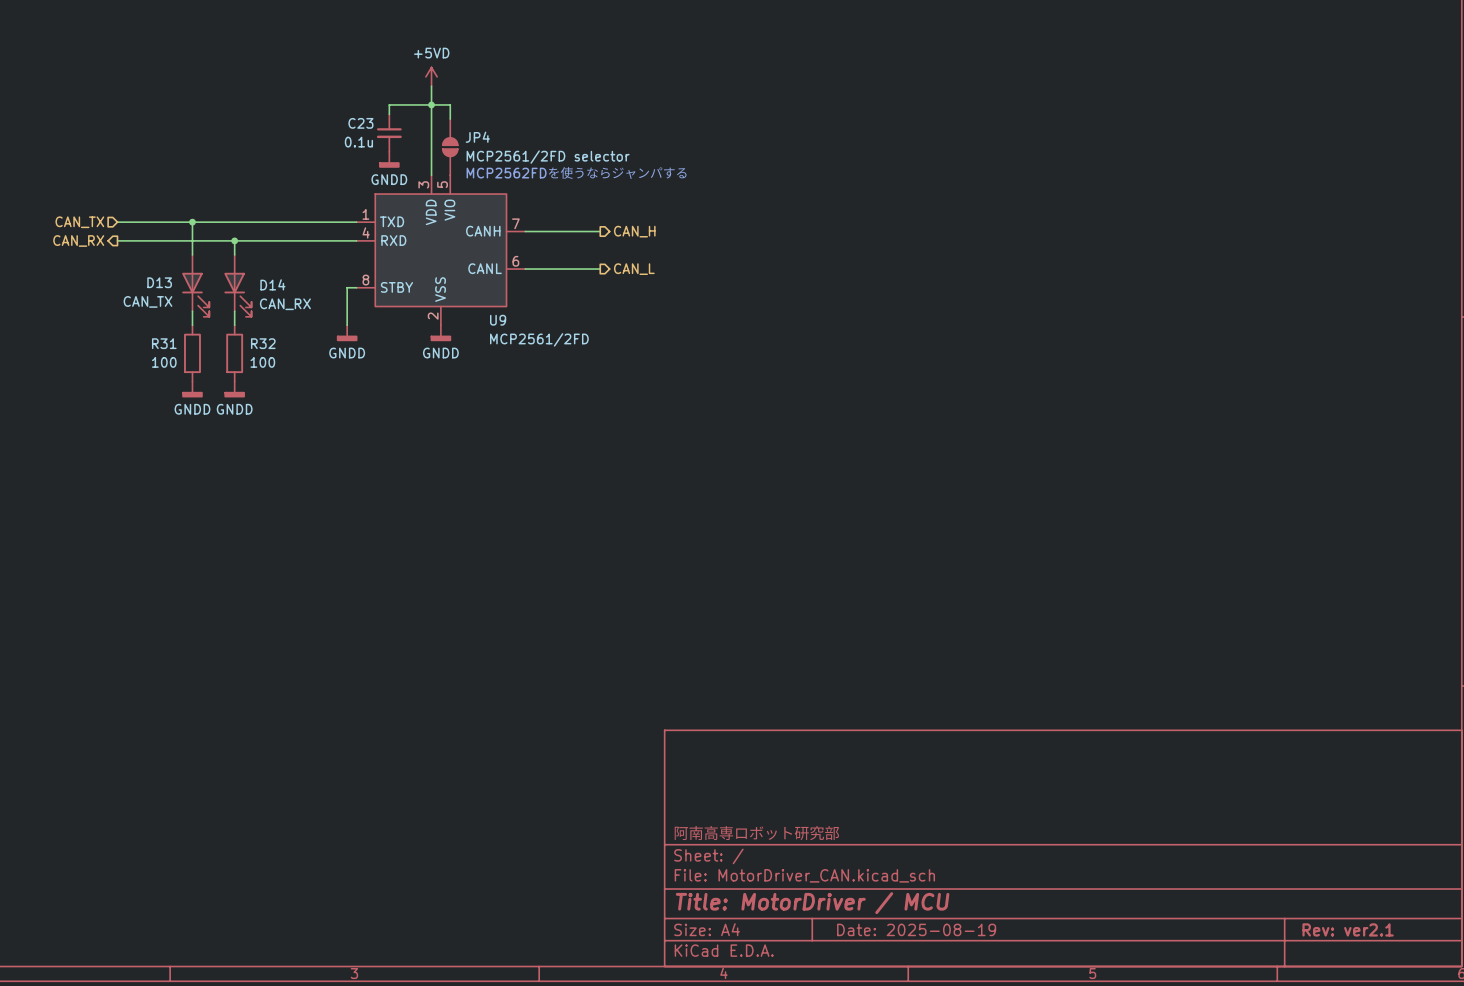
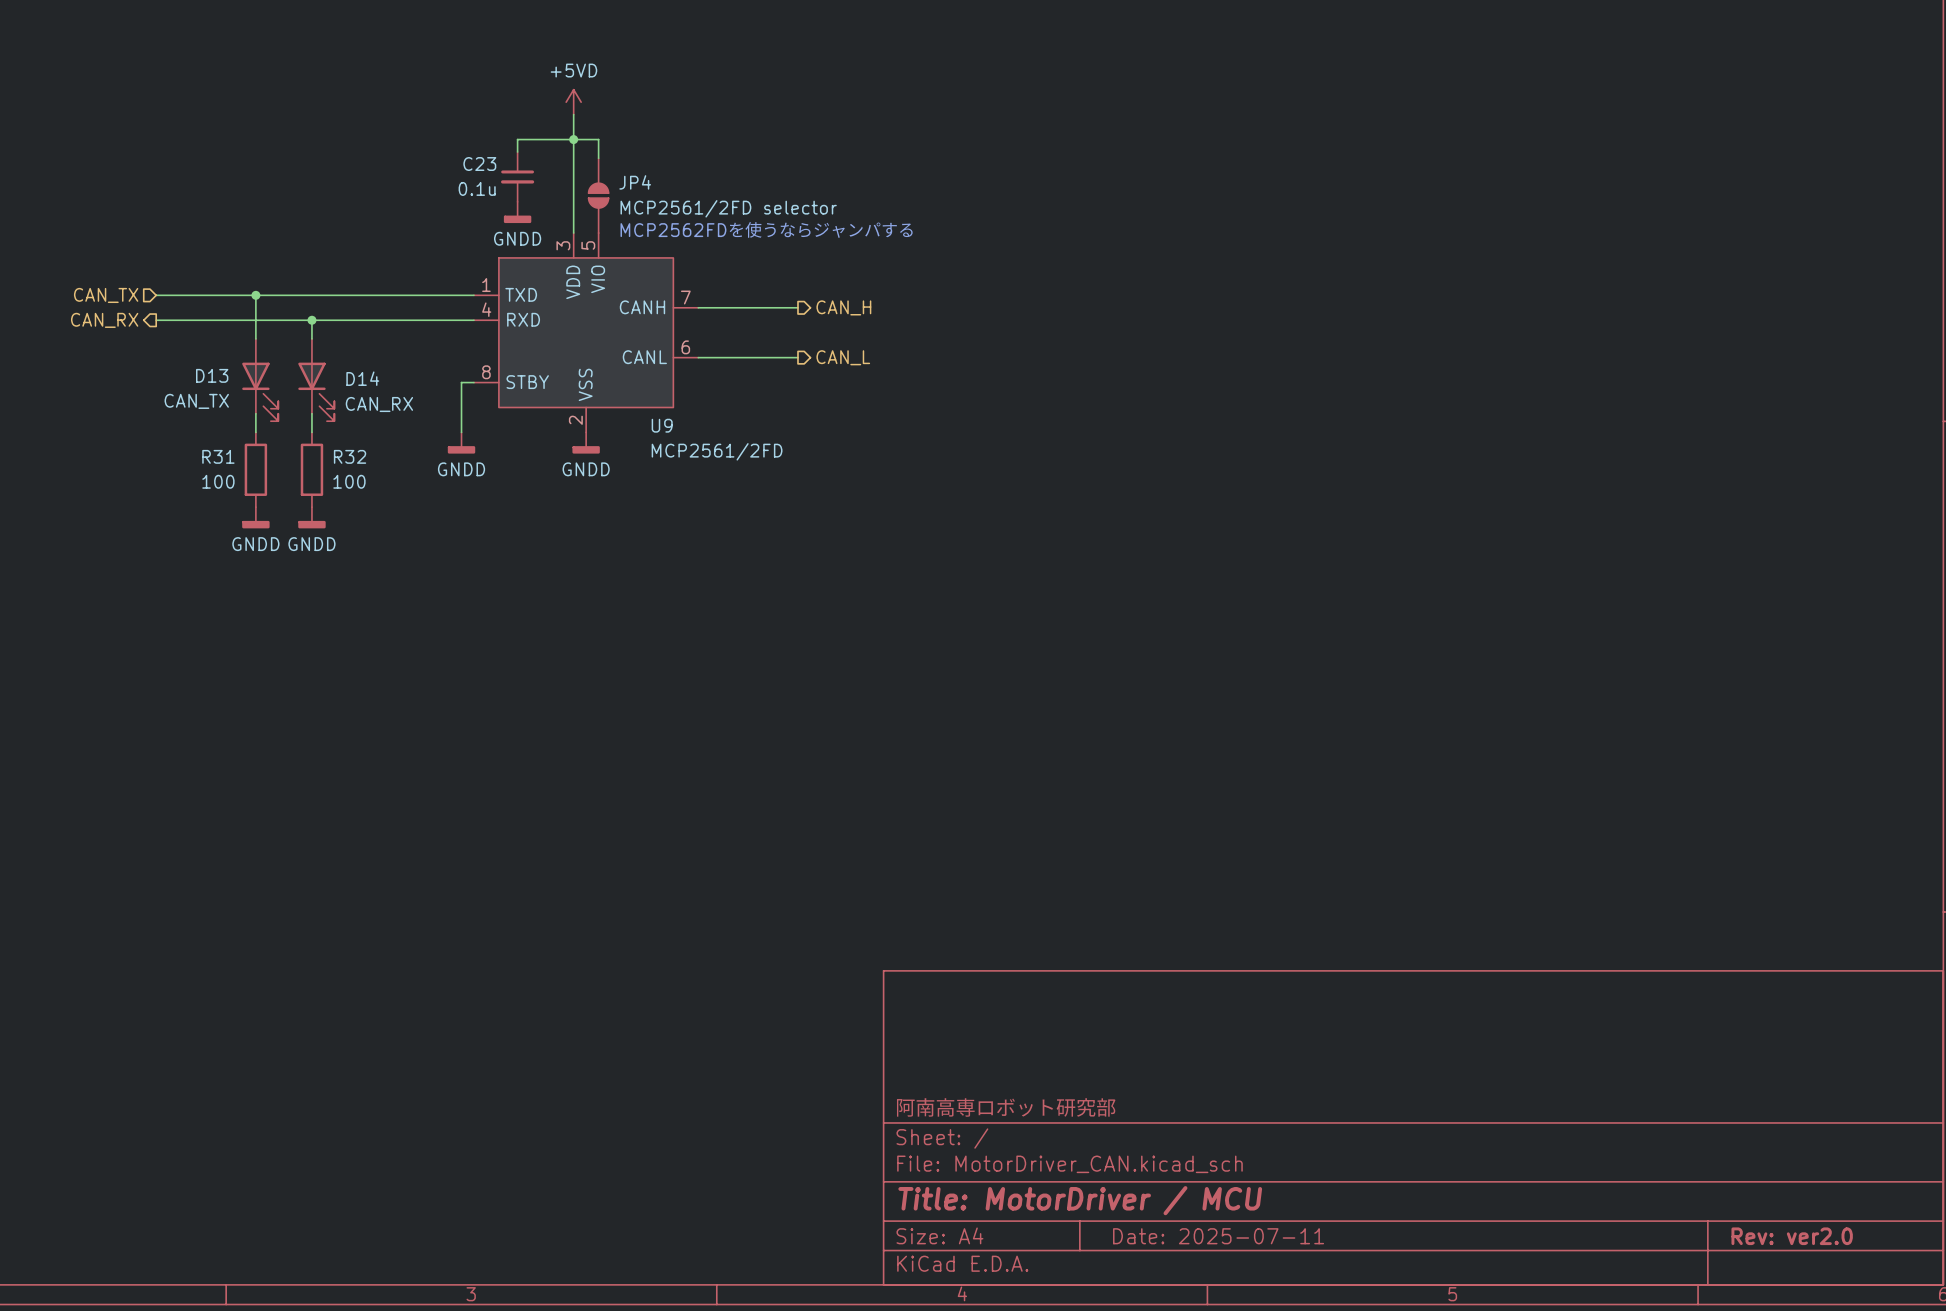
title block: Date: 2025-08-19 (916, 929) -> Date: 2025-07-11 (1218, 1236)
title block: Rev: ver2.1 (1348, 929) -> Rev: ver2.0 (1792, 1236)

